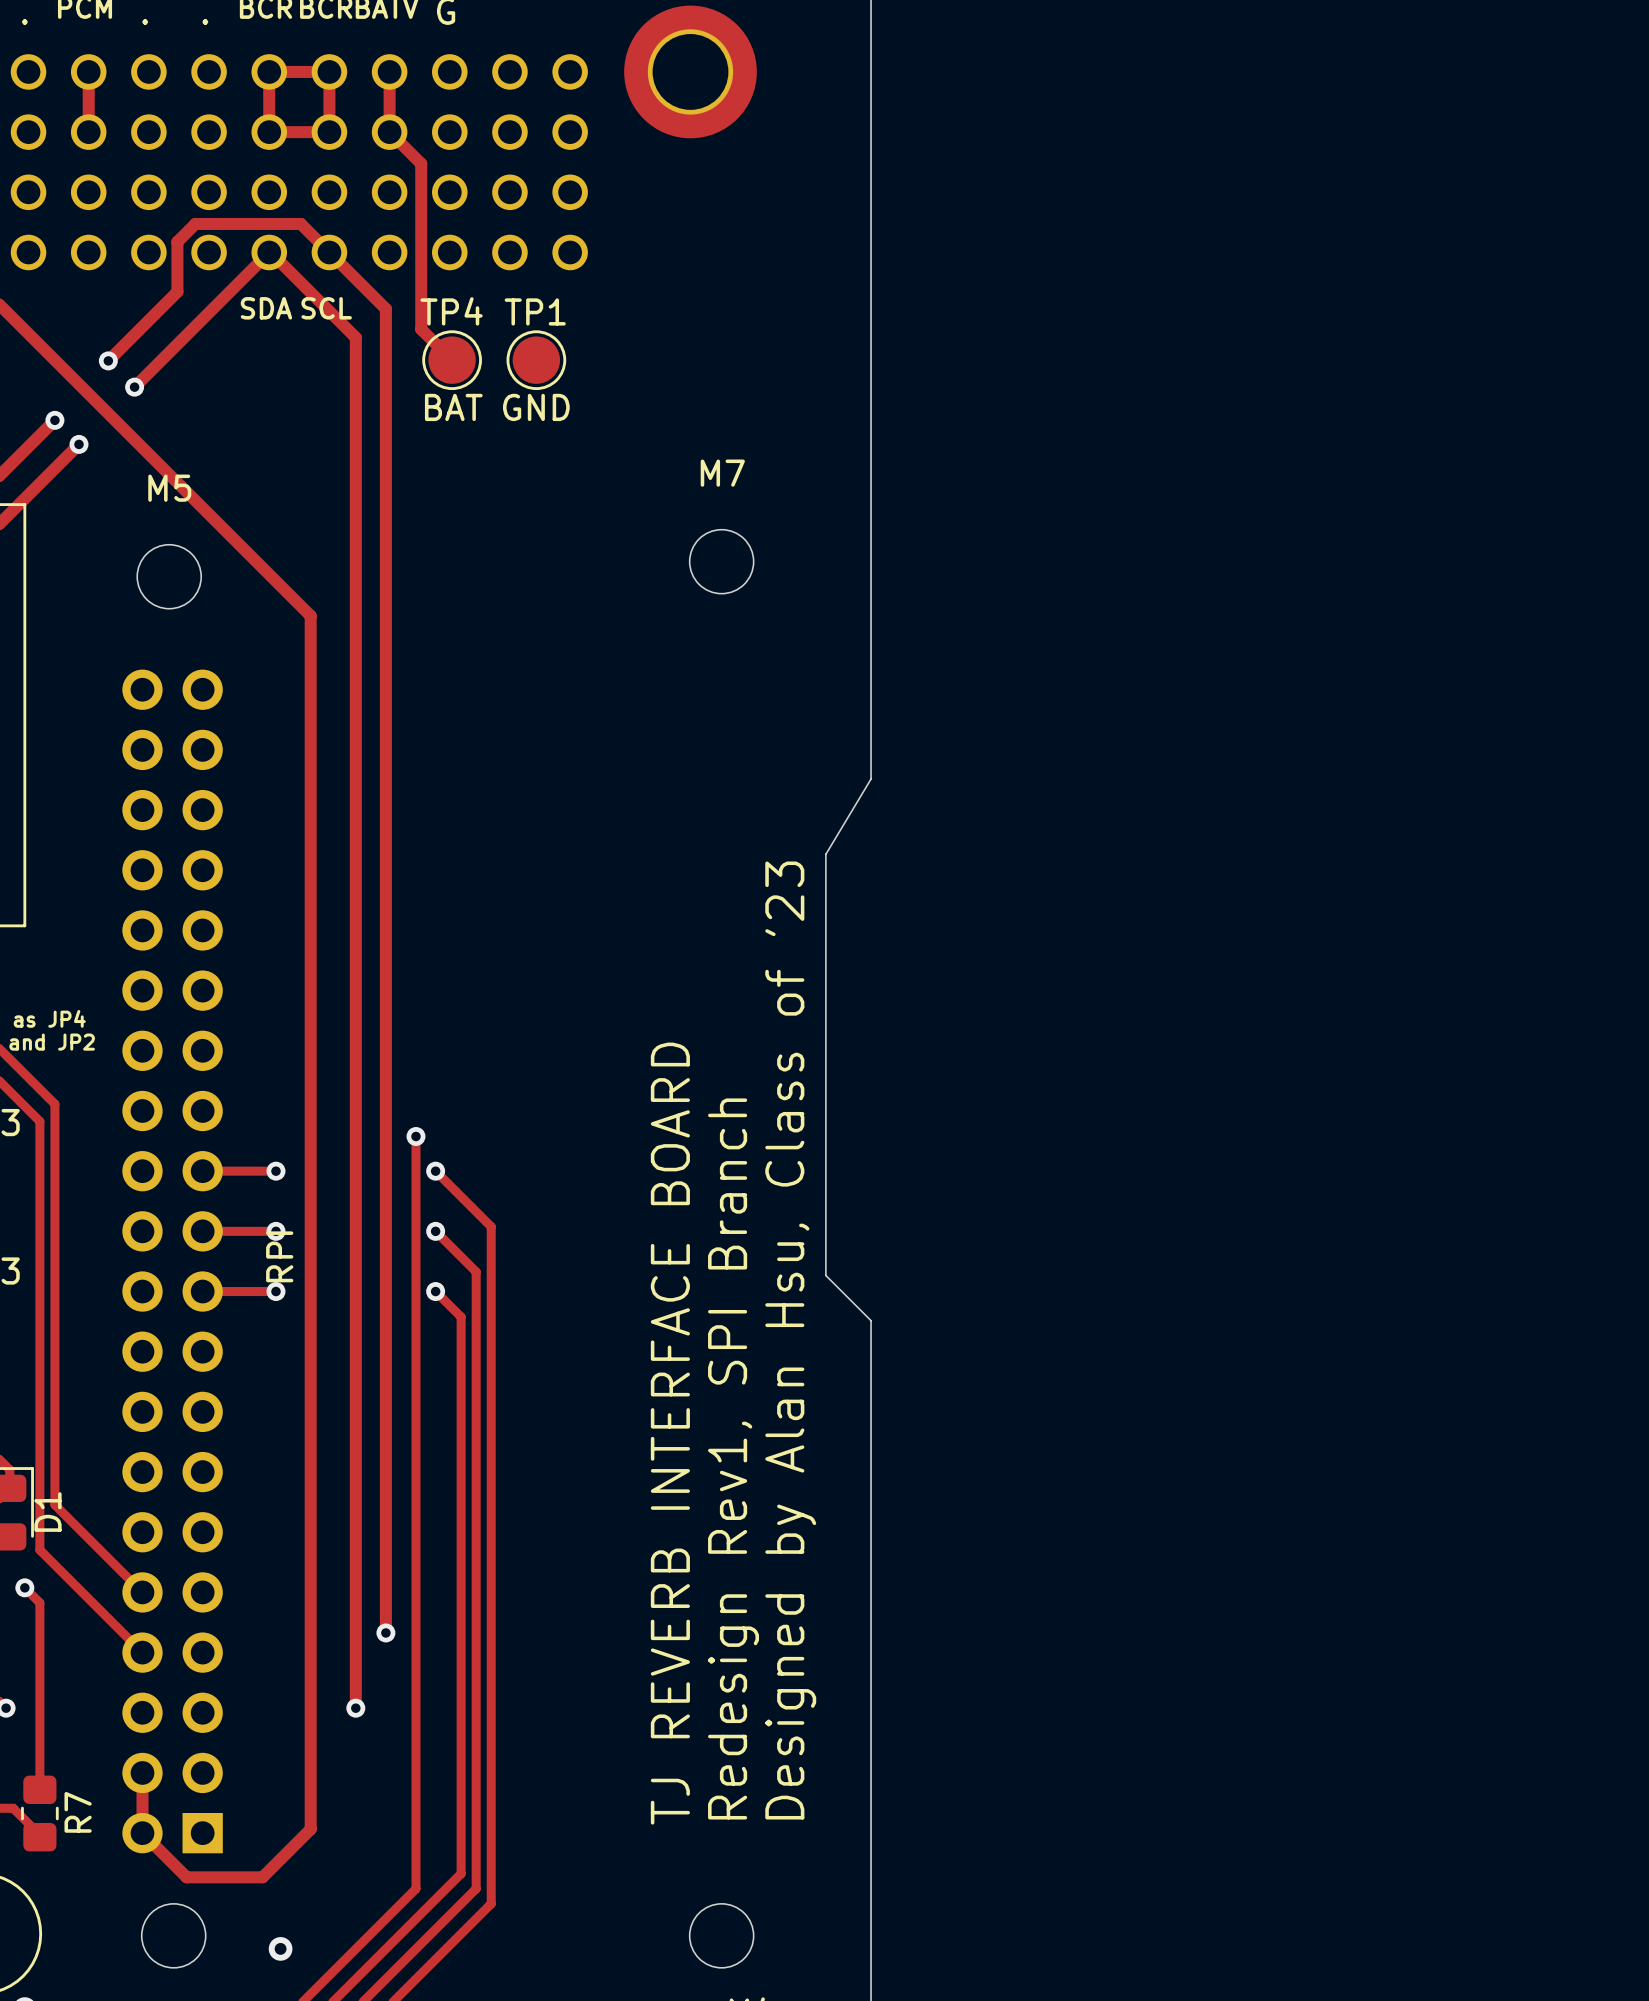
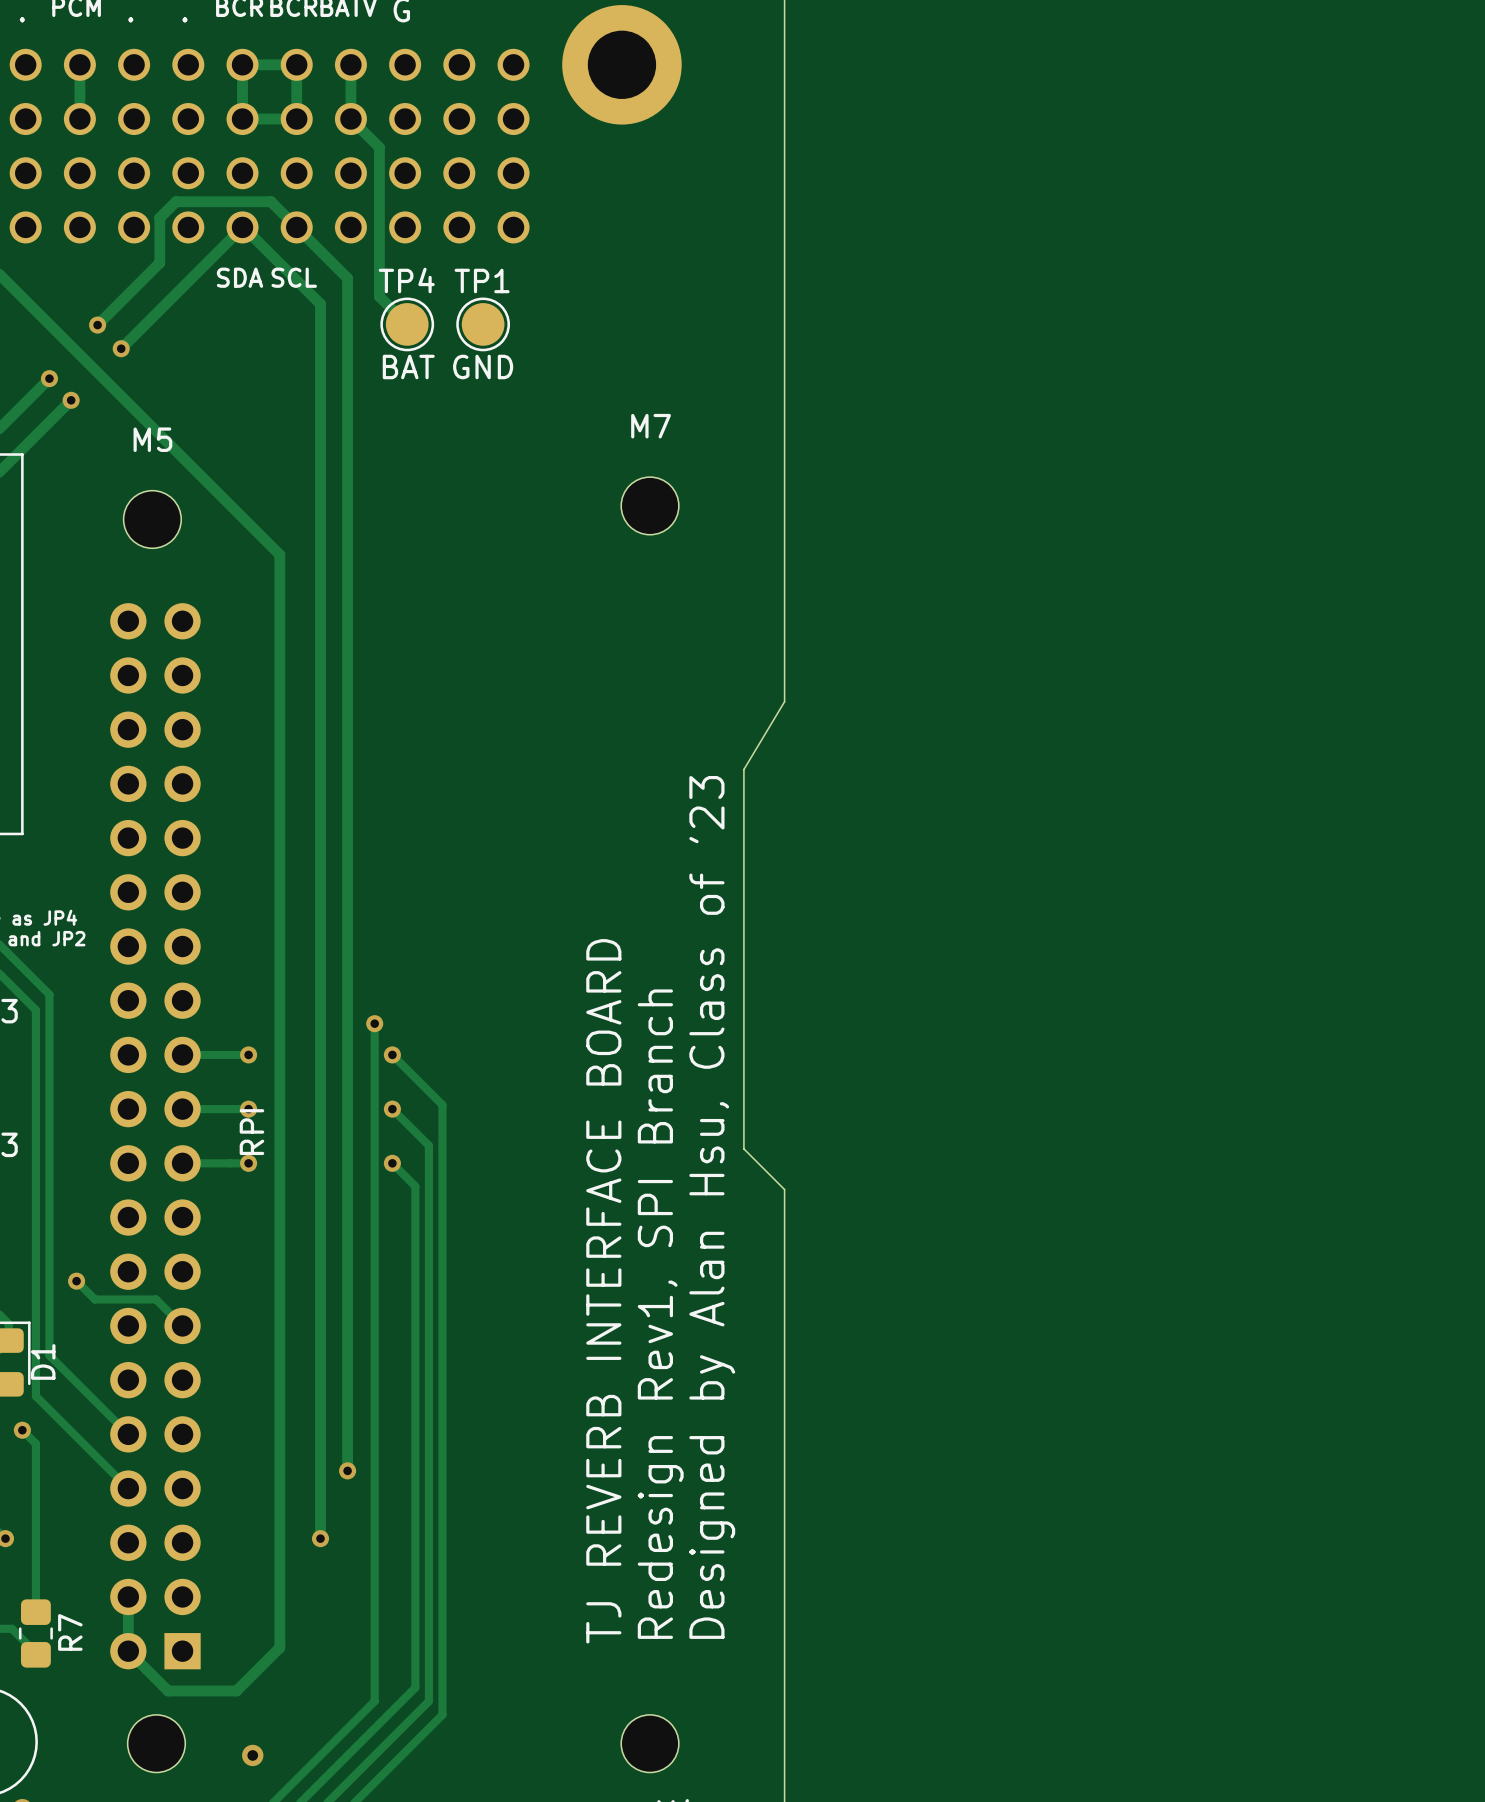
track: none -> (76, 1281) (94, 1299) (156, 1299) (182, 1325)
via: none -> (76, 1281)

